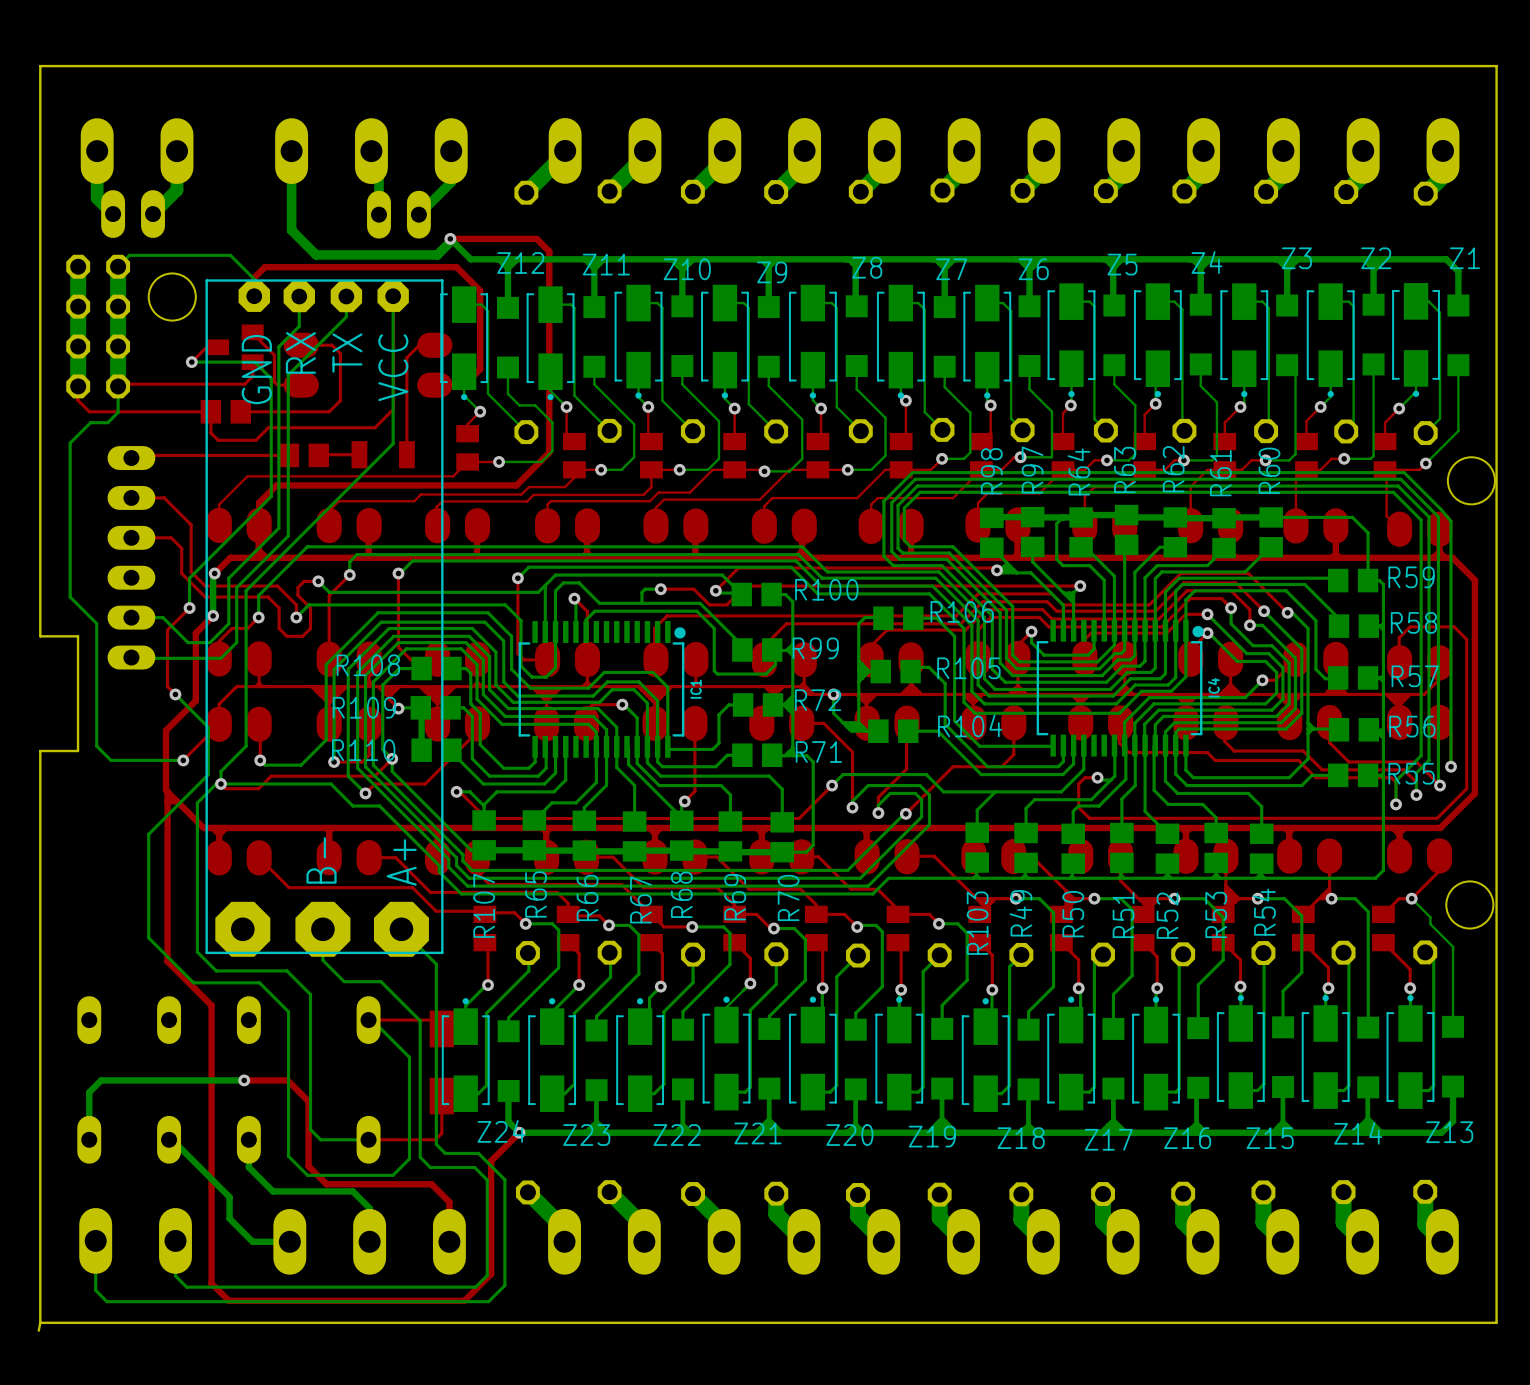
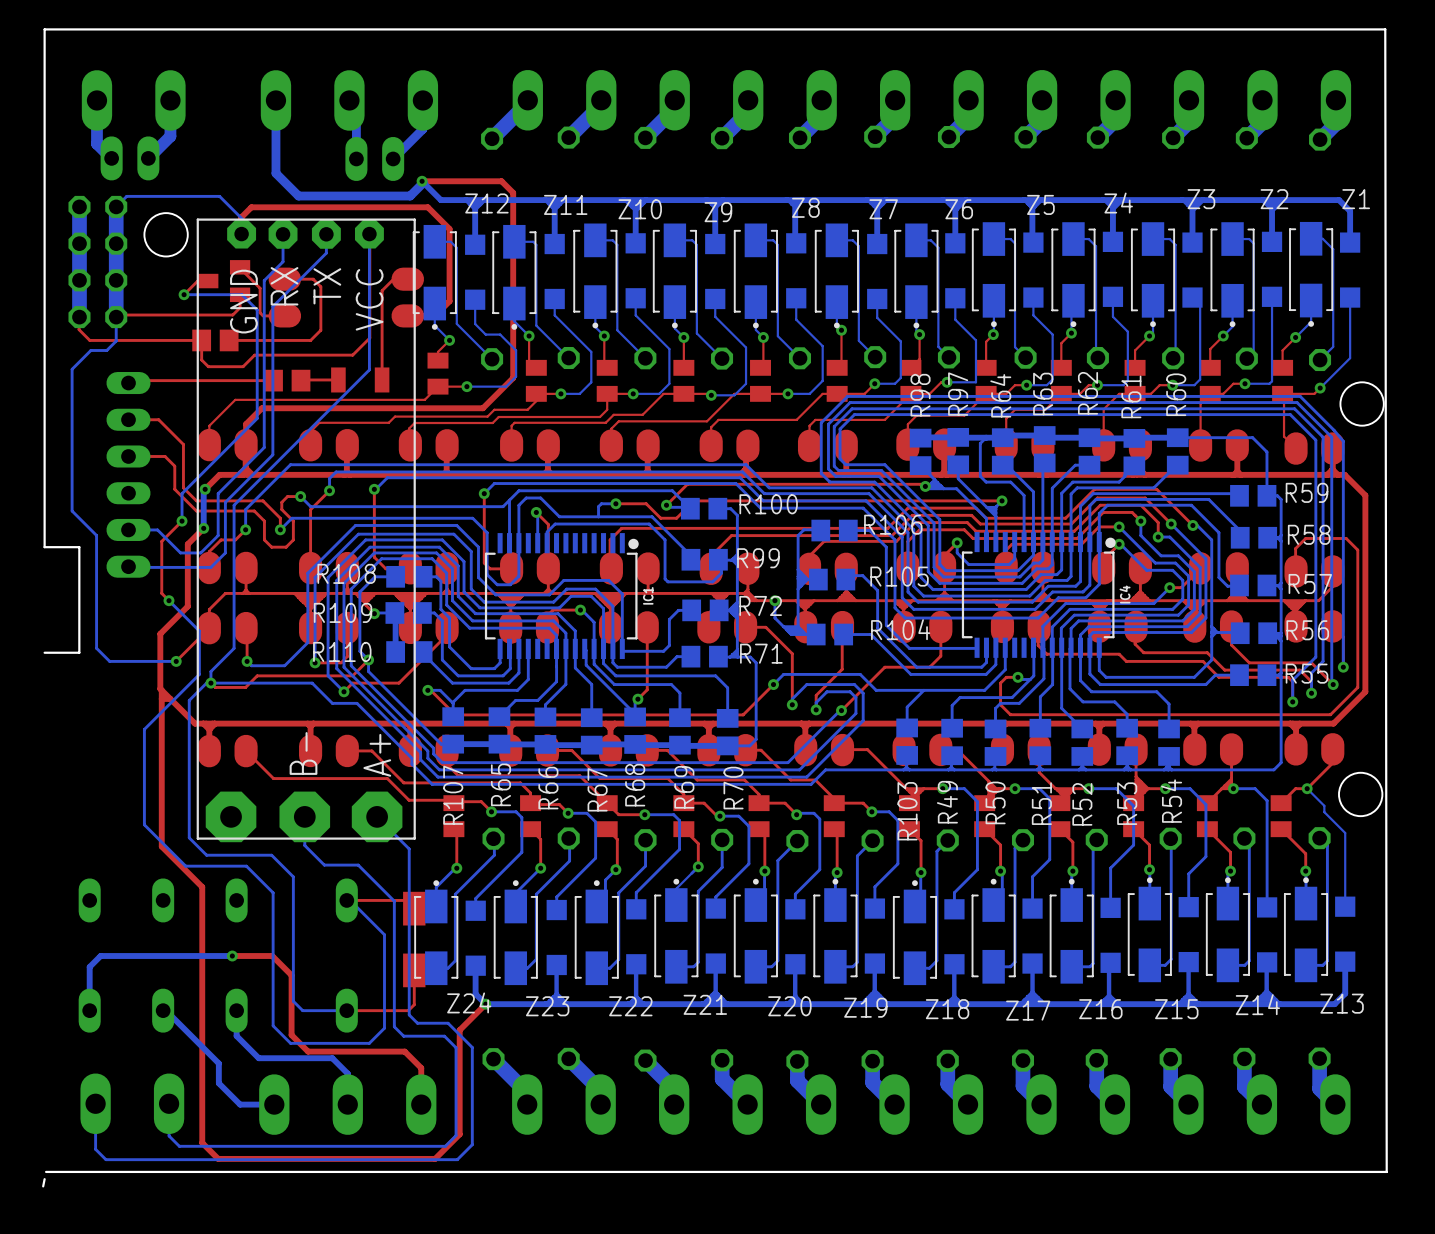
board edge: (40, 73) (40, 66) (1496, 66) (1496, 1322) (40, 1322) (40, 751) -> (44, 29) (1385, 29) (1386, 1171) (46, 1171)

